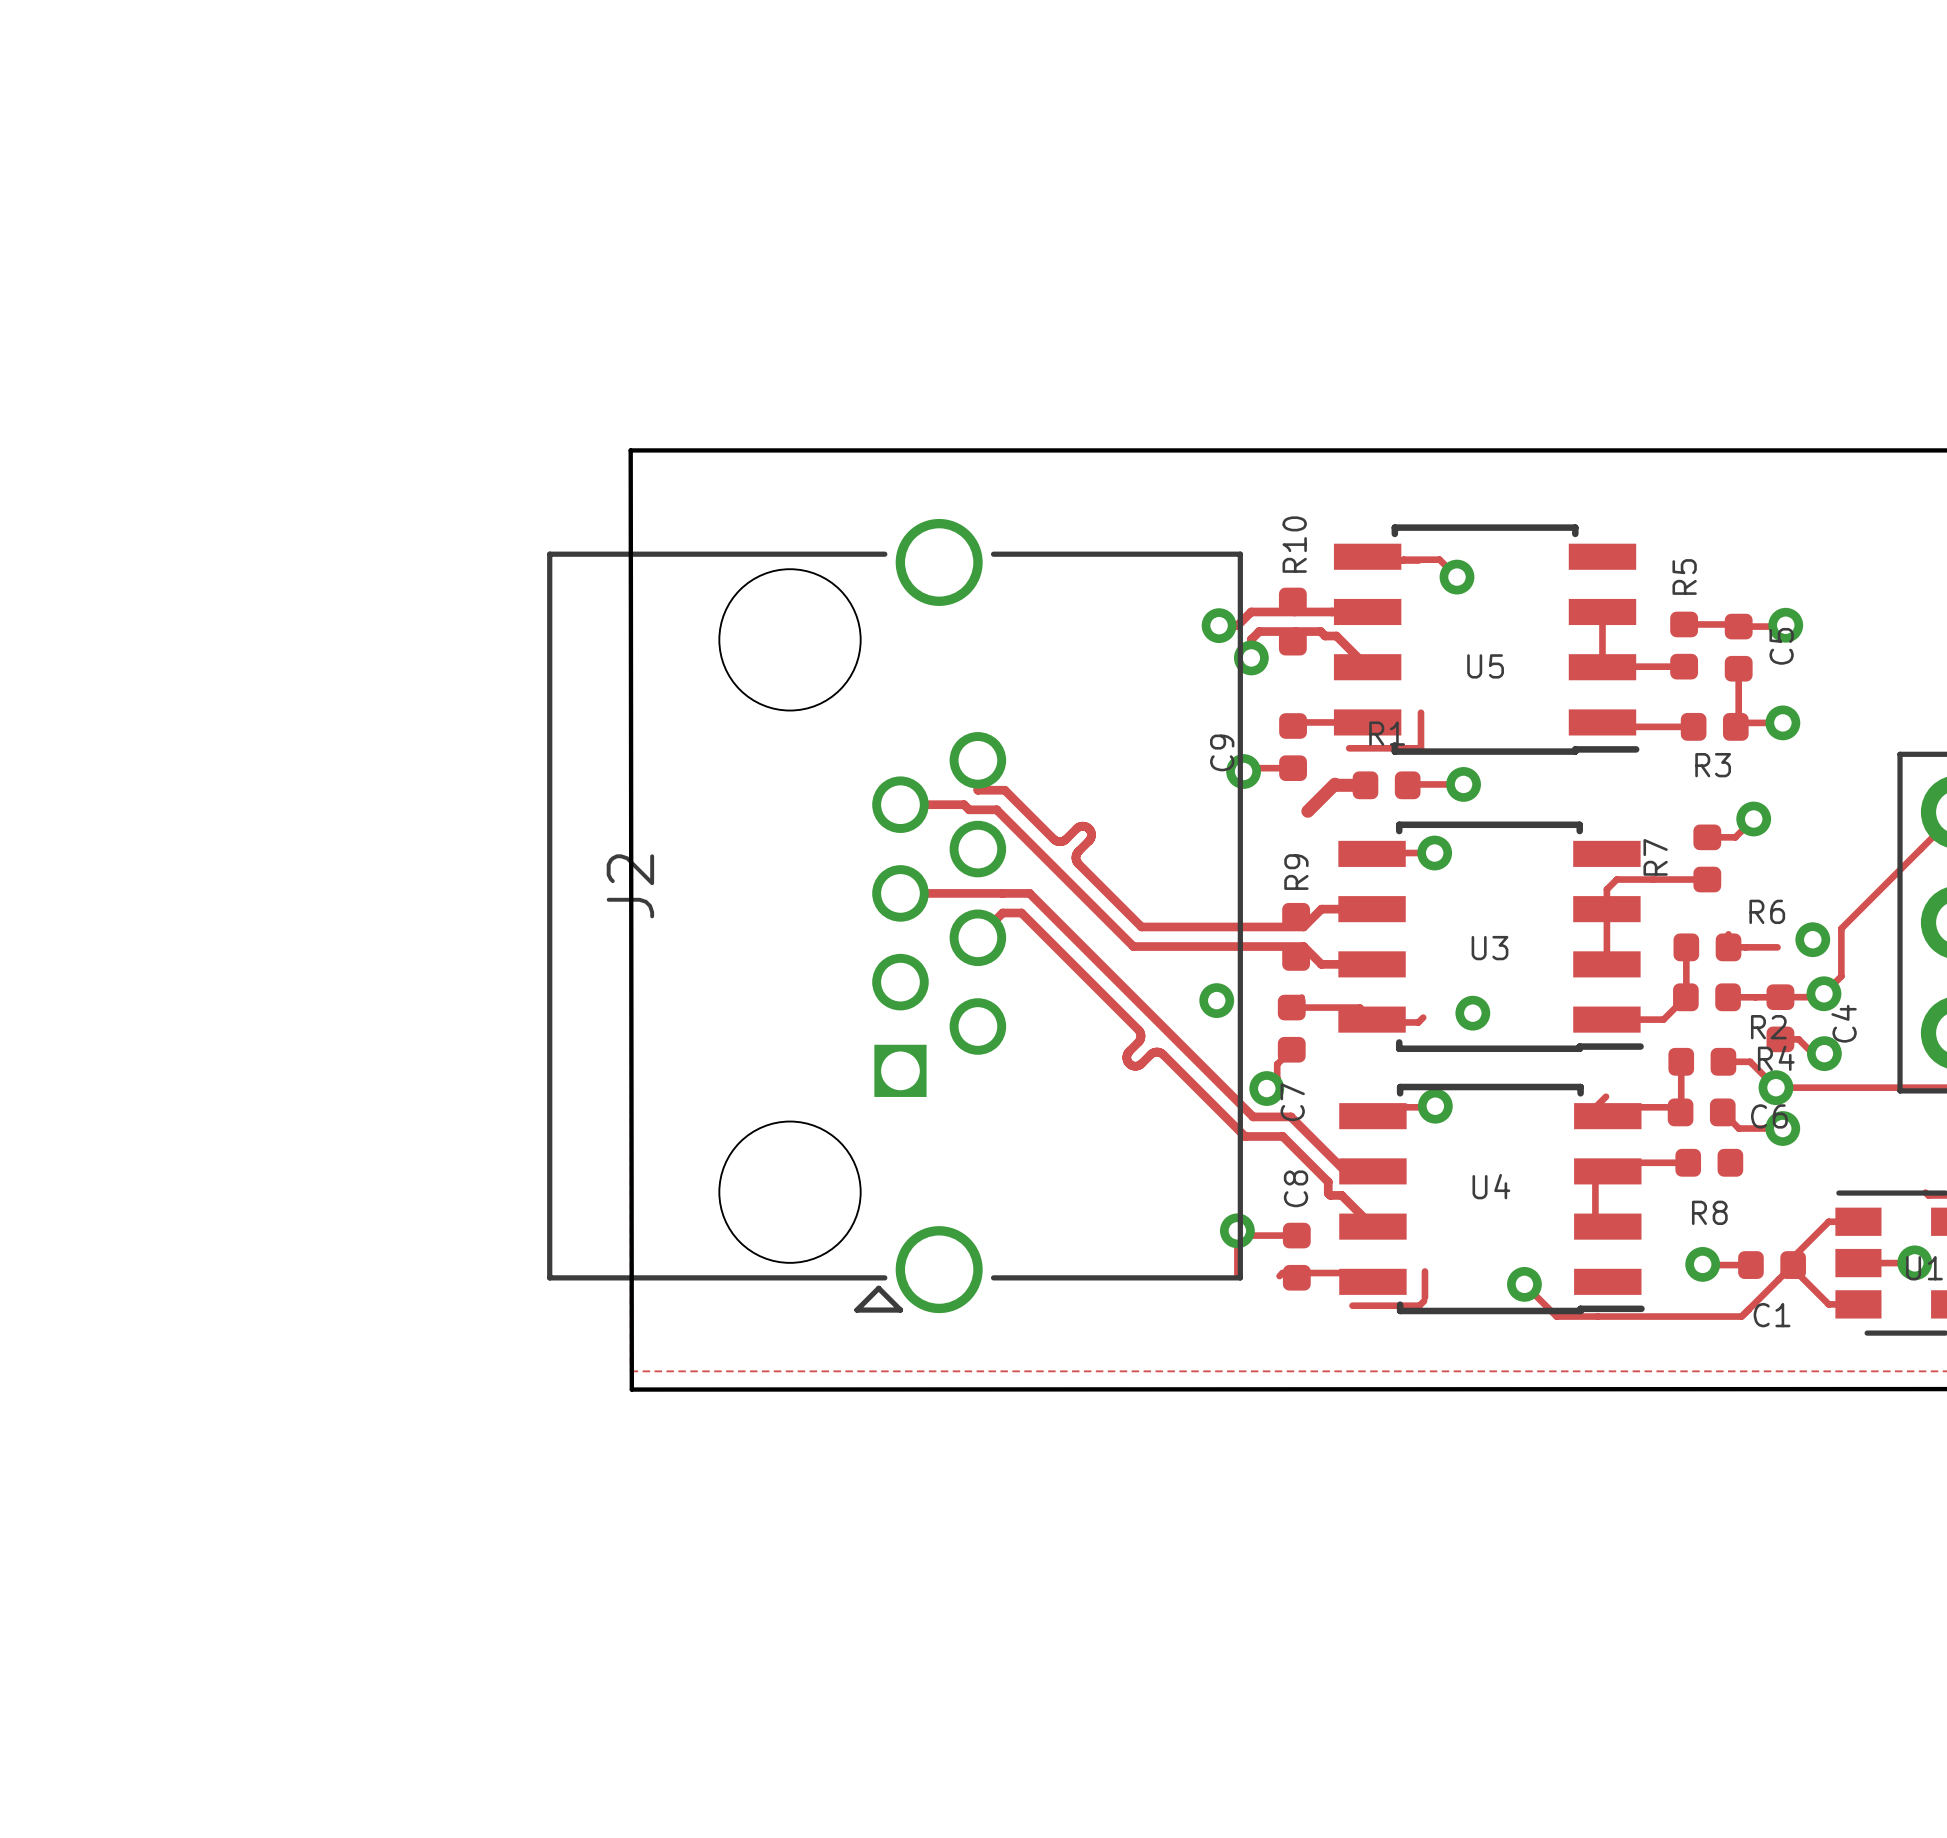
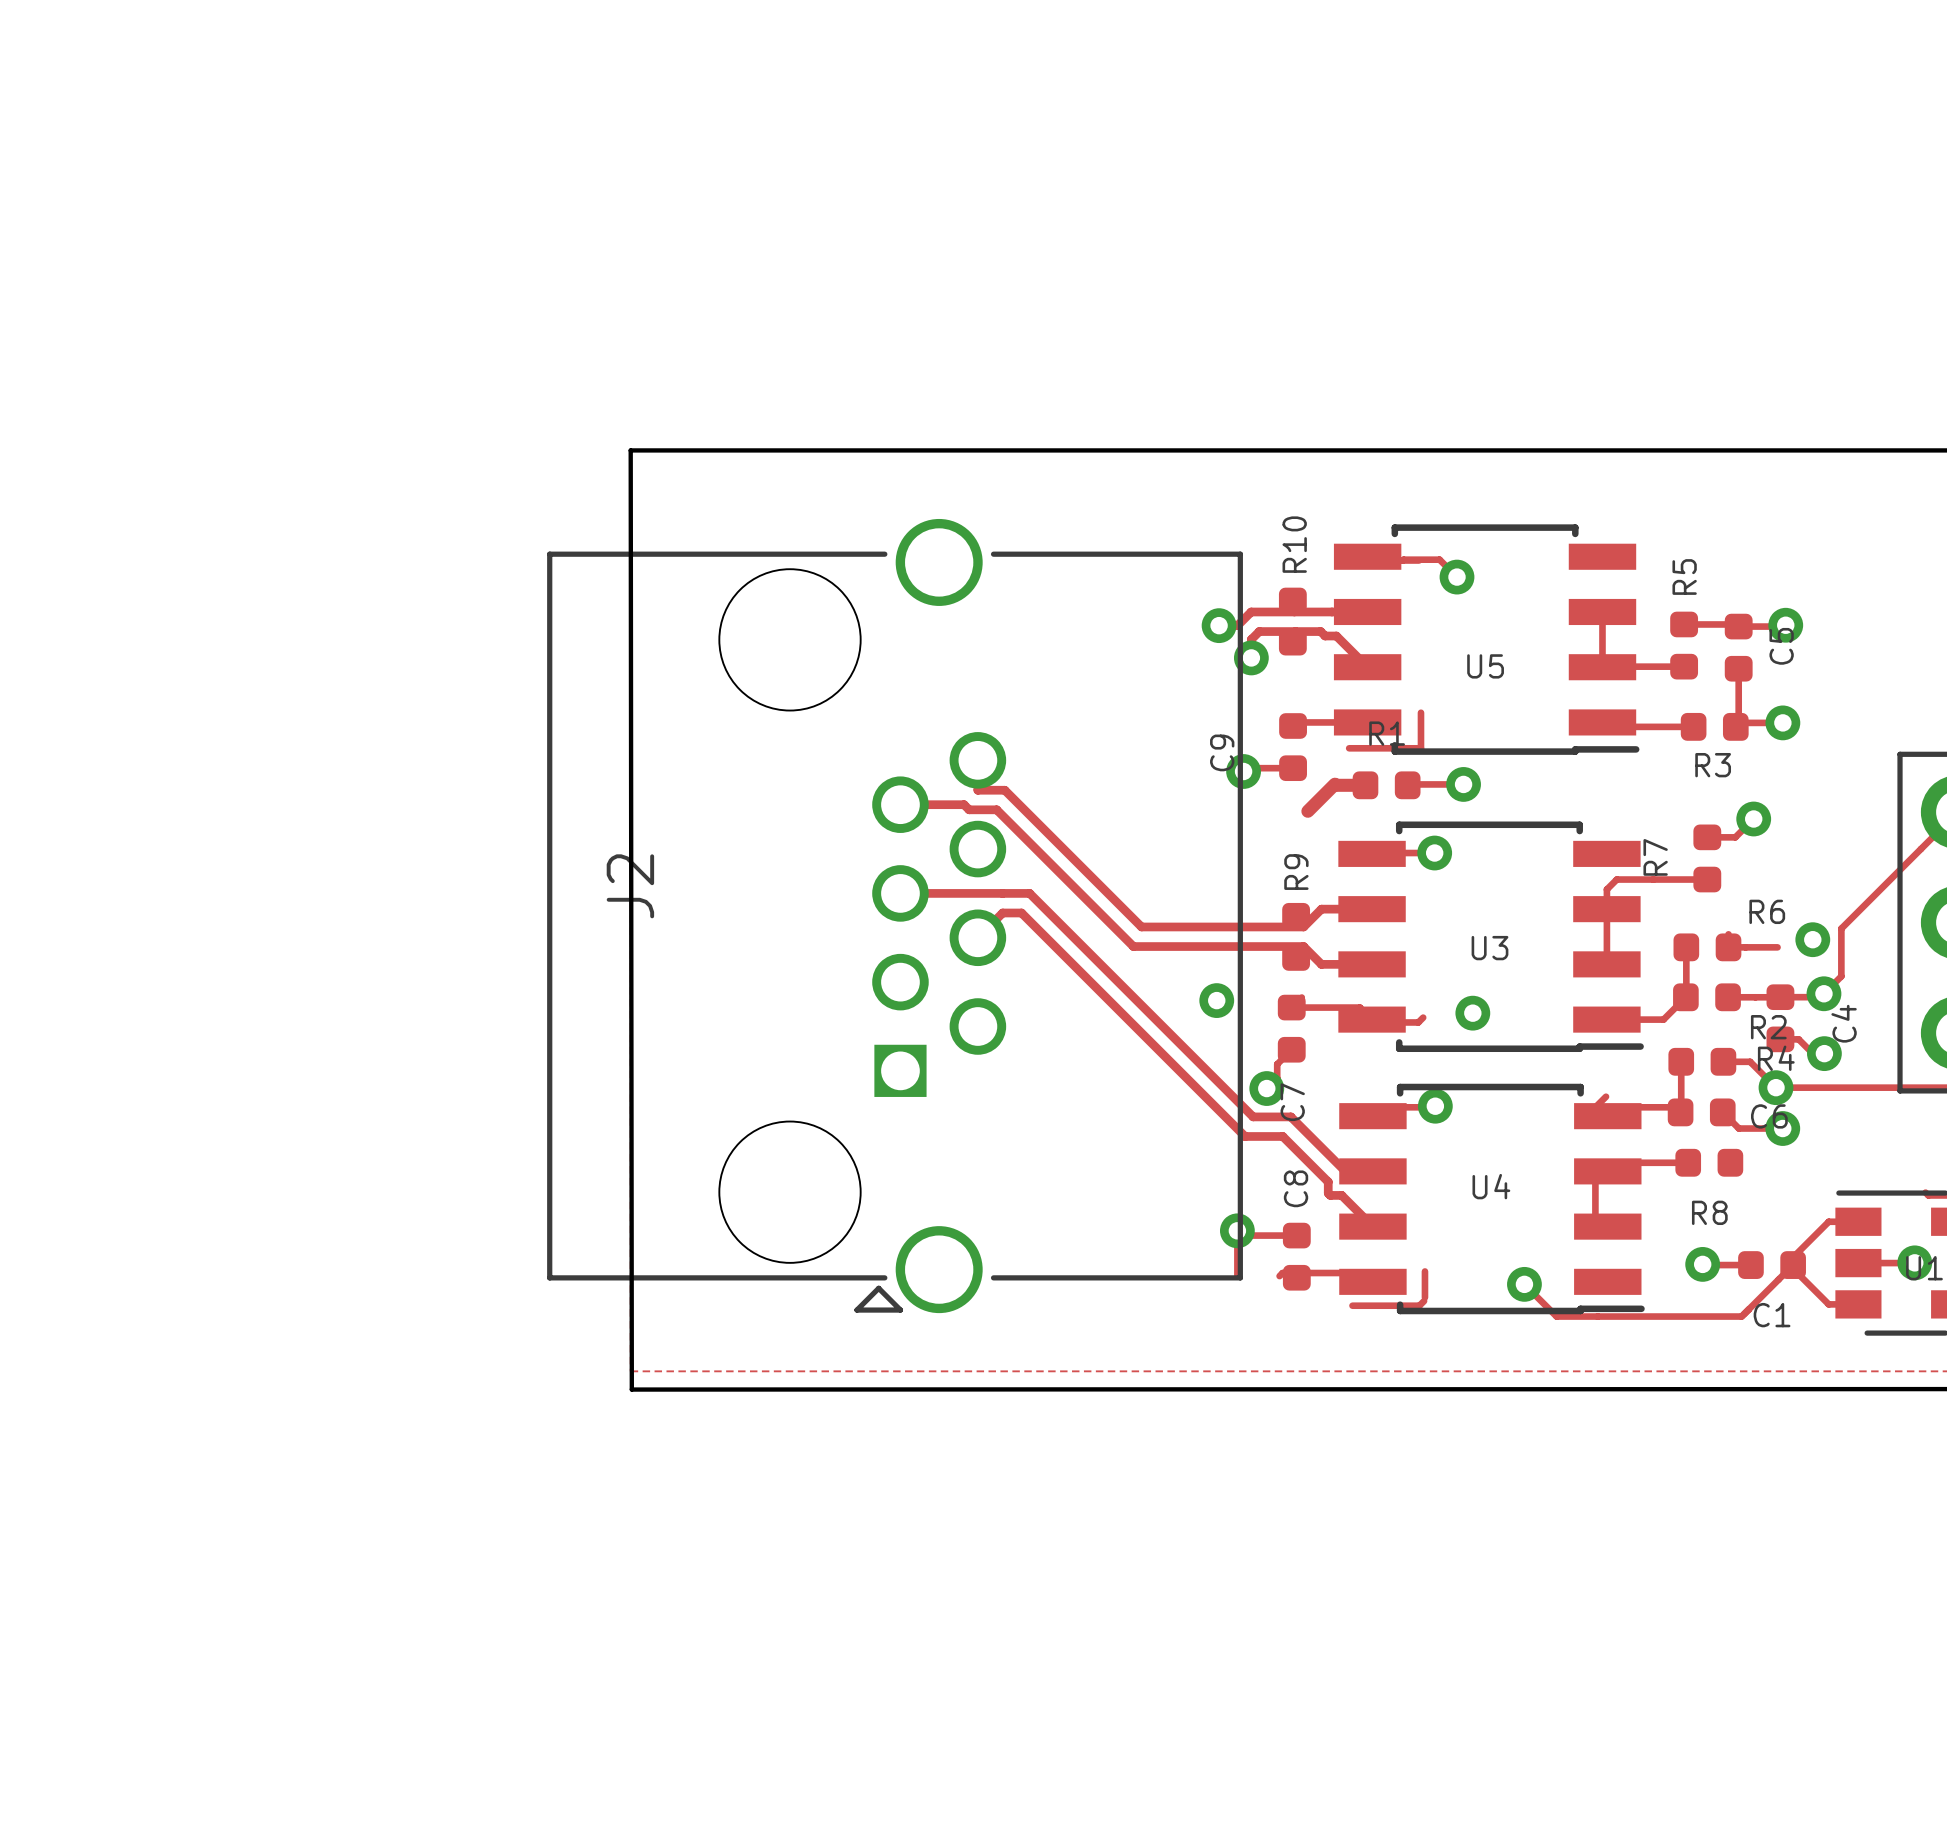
track: (1053, 839) (1058, 841) (1064, 840) (1079, 826) (1088, 828) (1091, 833) (1090, 839) (1076, 854) (1078, 863) -> (1053, 839) (1078, 863)
track: (1138, 1029) (1140, 1038) (1127, 1054) (1129, 1063) (1138, 1065) (1154, 1052) (1163, 1054) -> (1138, 1029) (1163, 1054)

